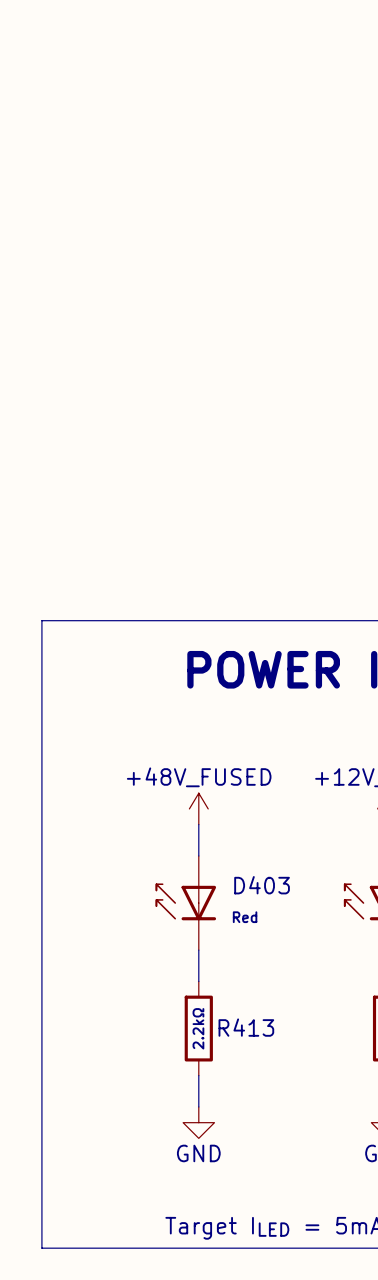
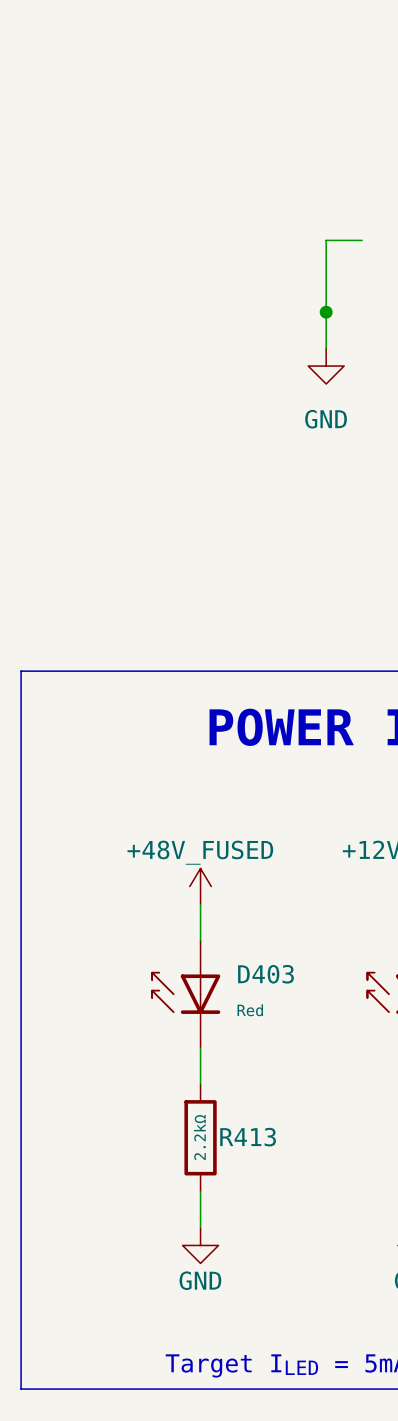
wire: none -> (362, 240) (326, 240) (326, 348)
junction: none -> (326, 312)
power symbol: none -> GND (326, 366)

